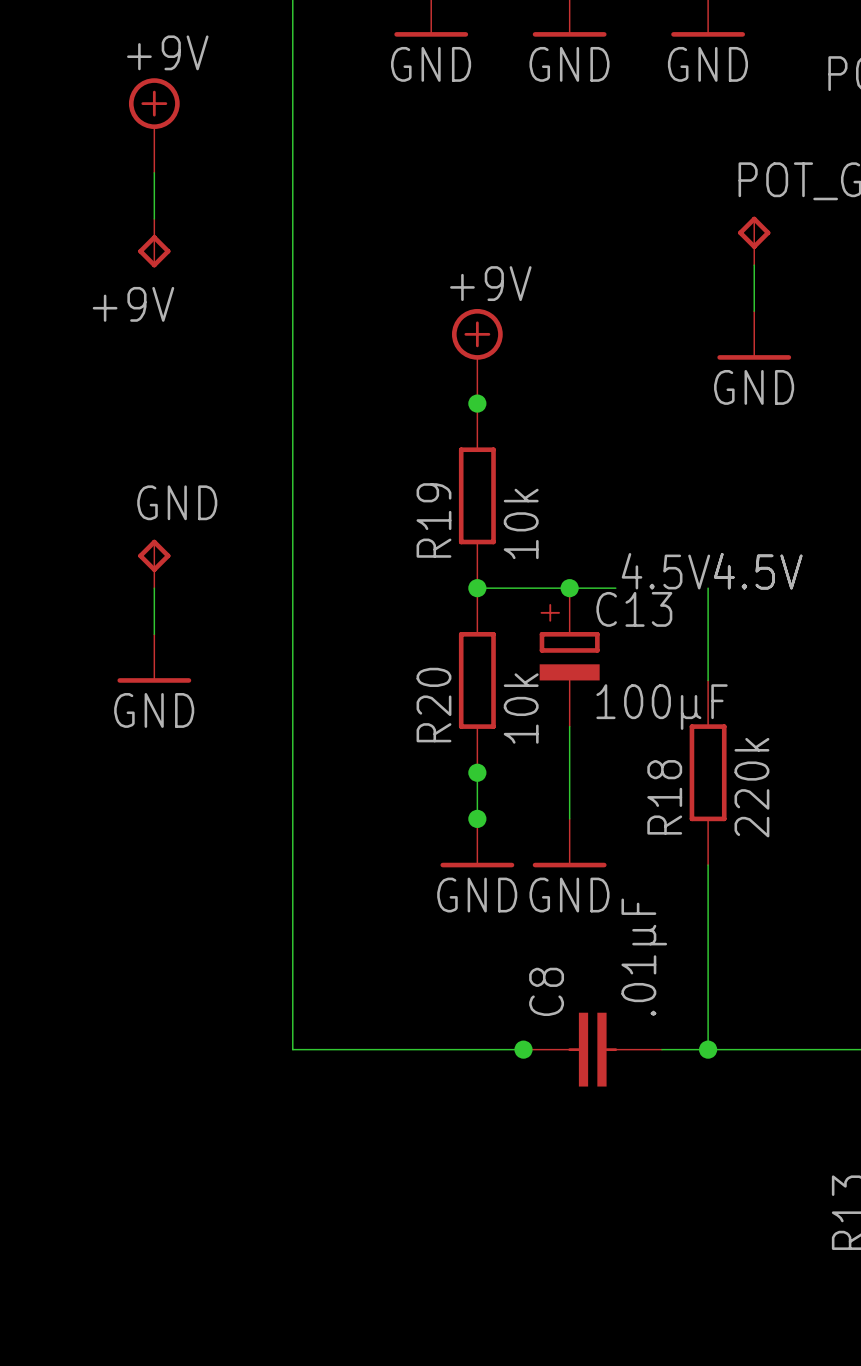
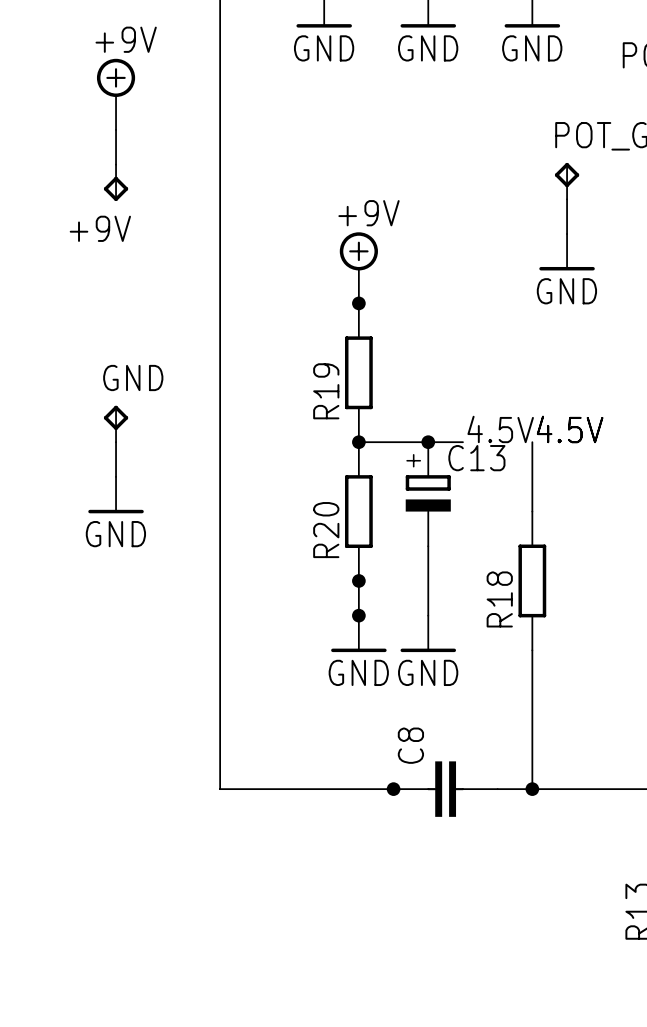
R19 value: 10k (521, 523) -> none
C13 value: 100µF (662, 707) -> none
R20 value: 10k (521, 708) -> none
R18 value: 220k (751, 787) -> none
C8 value: .01µF (644, 957) -> none

